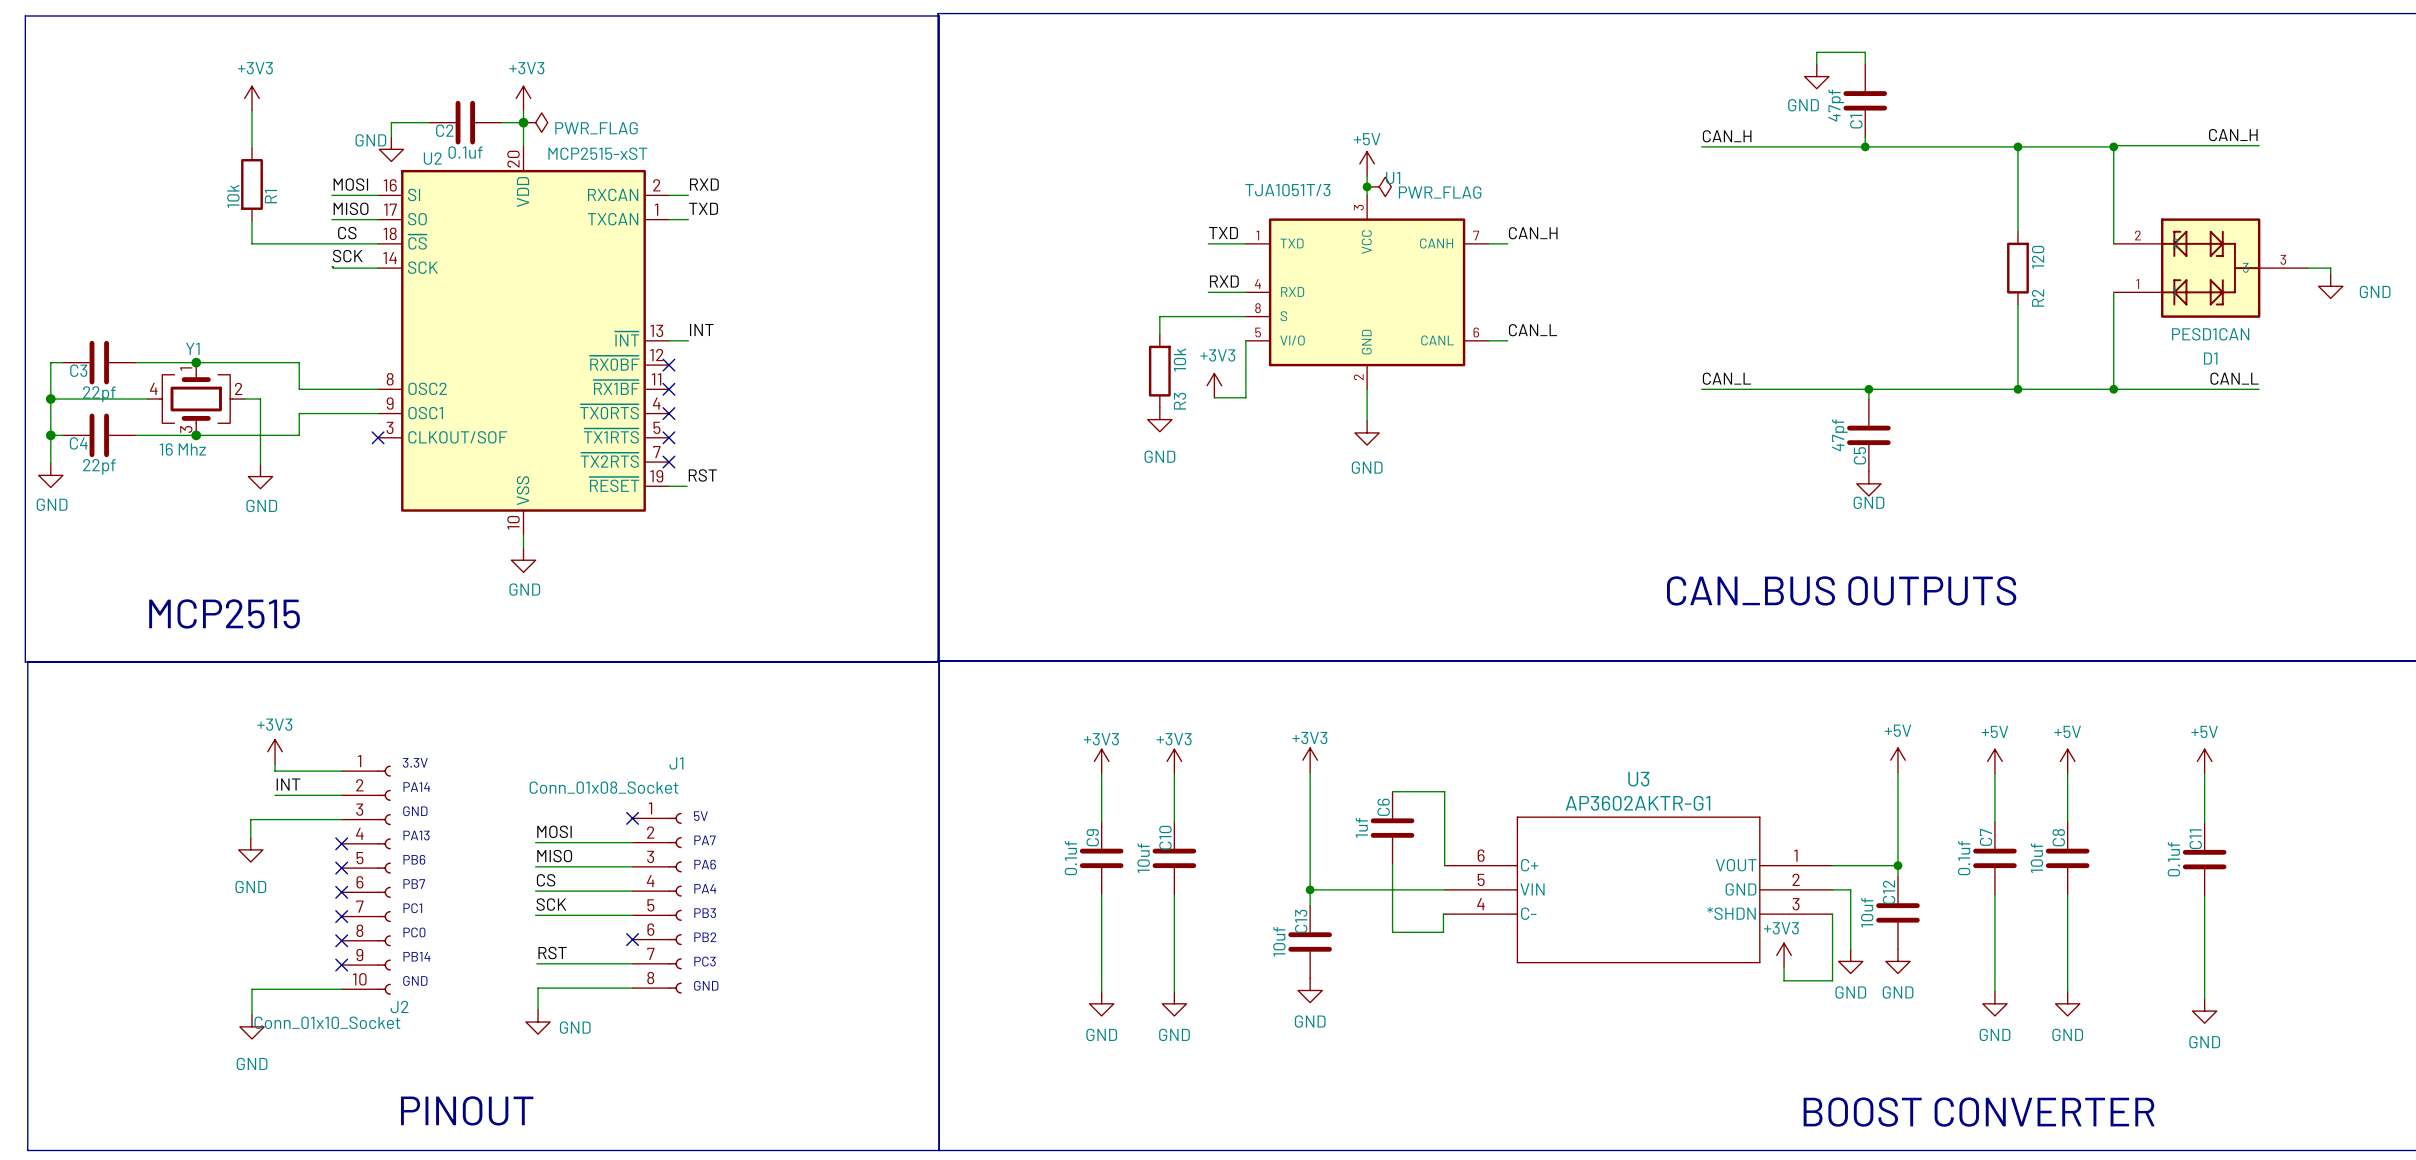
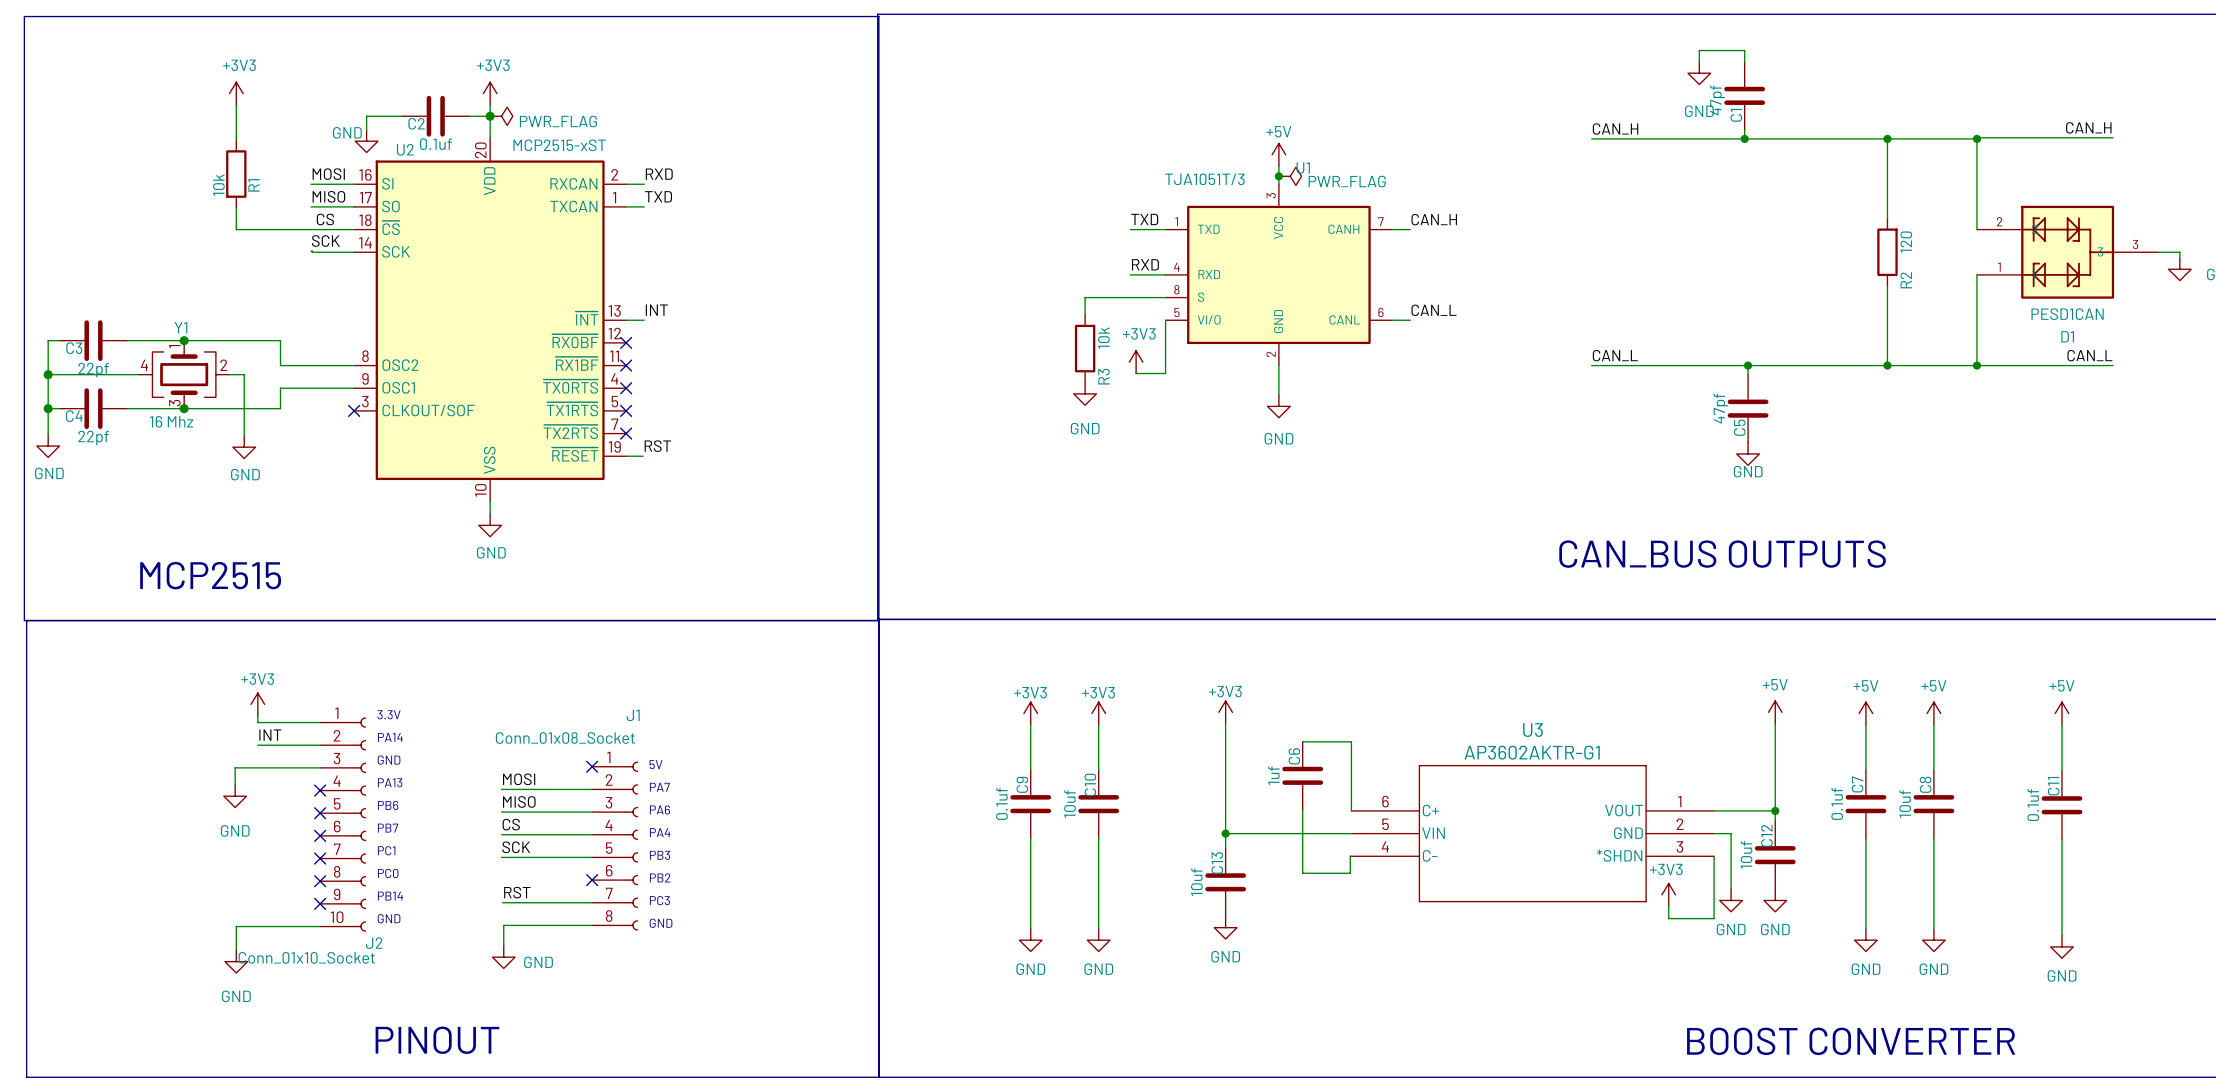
power symbol text position: GND (1803, 105) -> GND (1699, 111)

